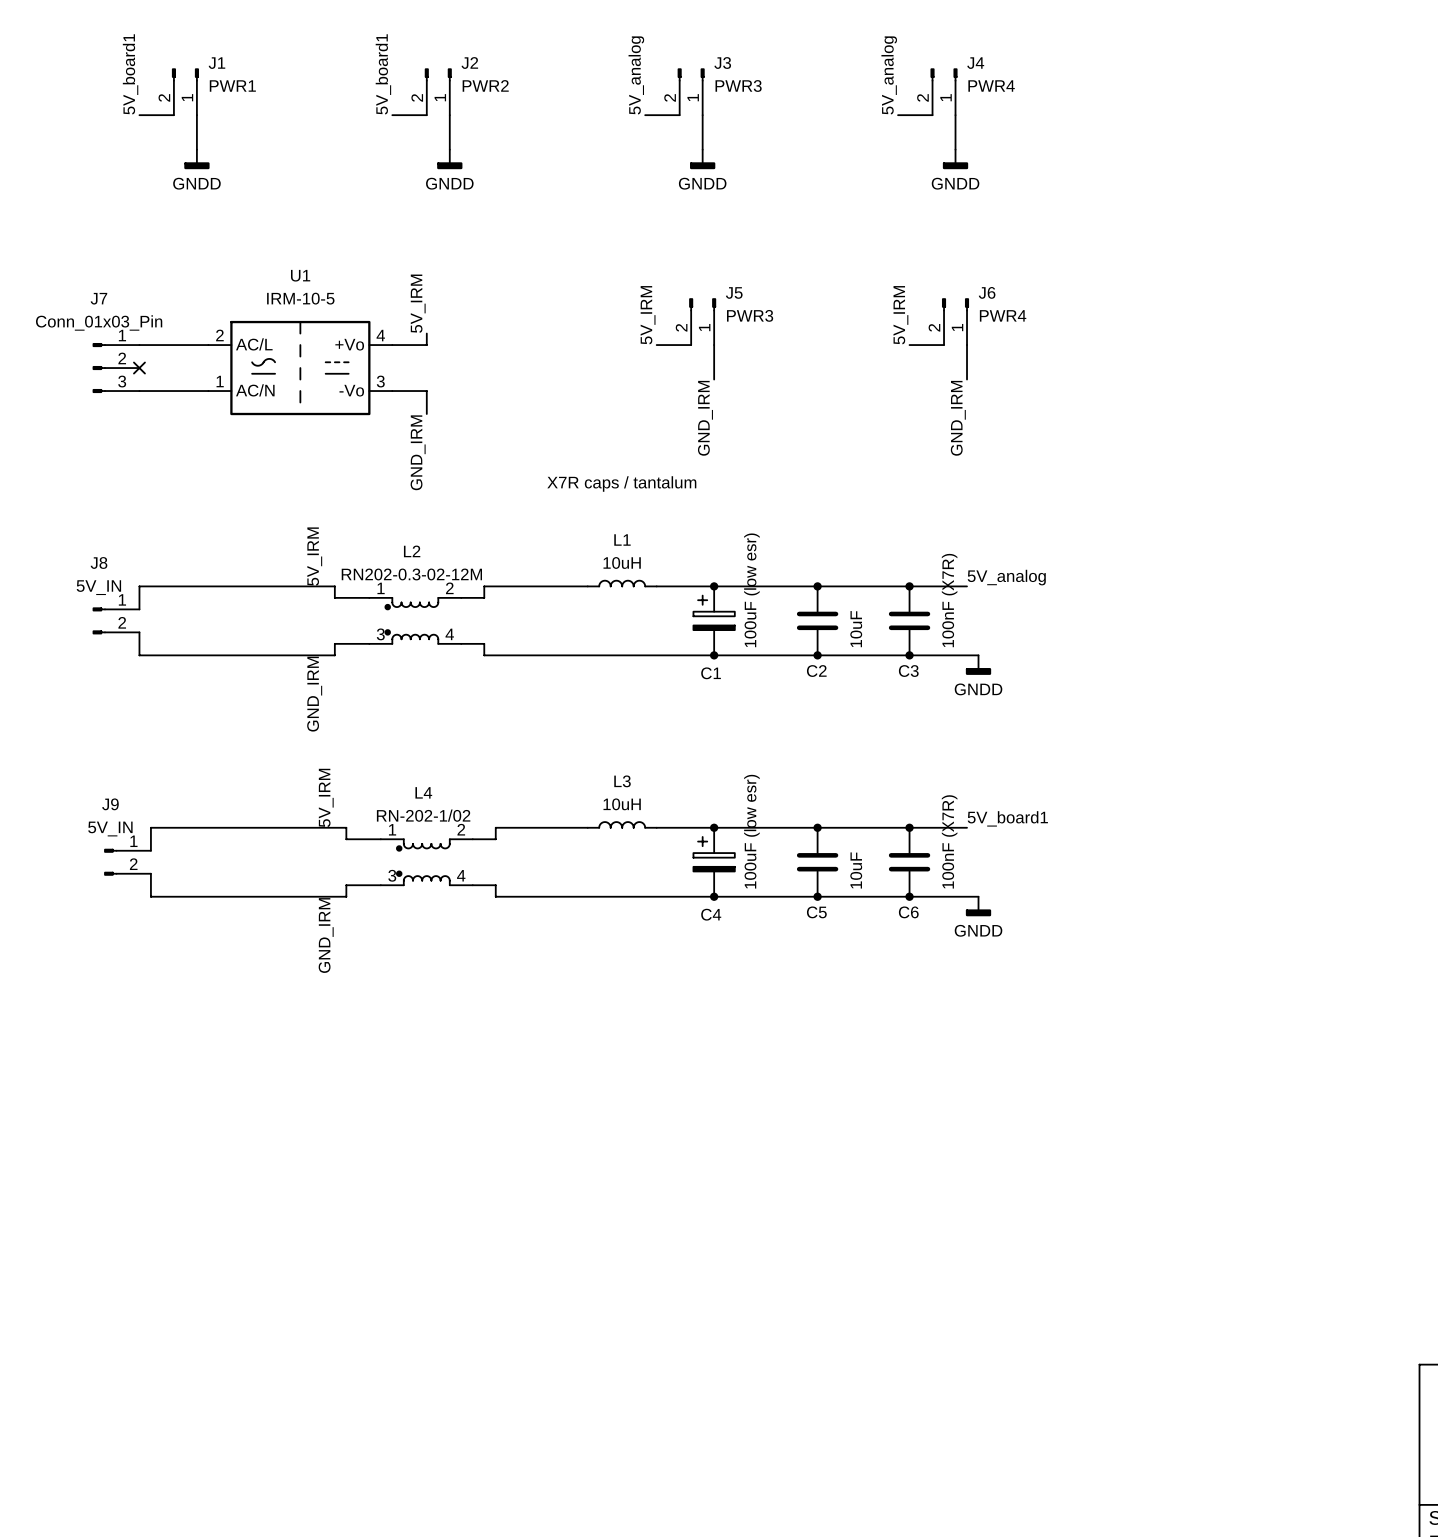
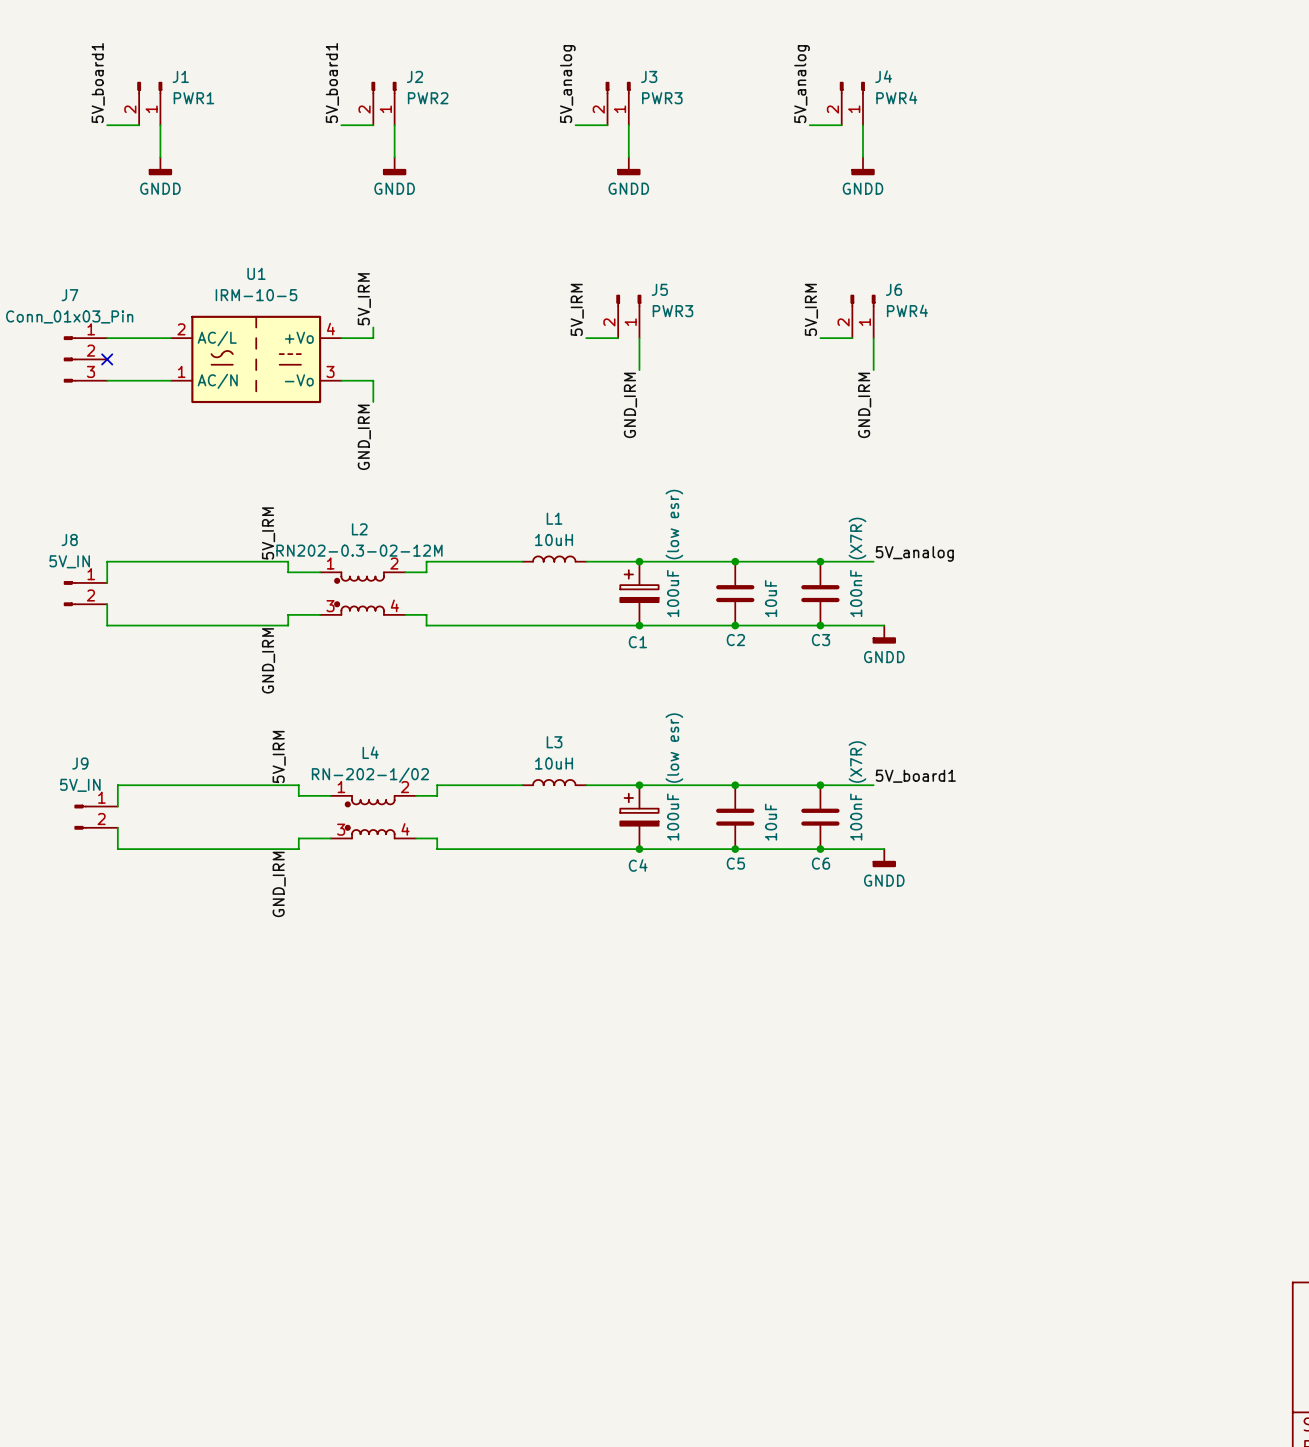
text: X7R caps / tantalum (621, 484) -> none

